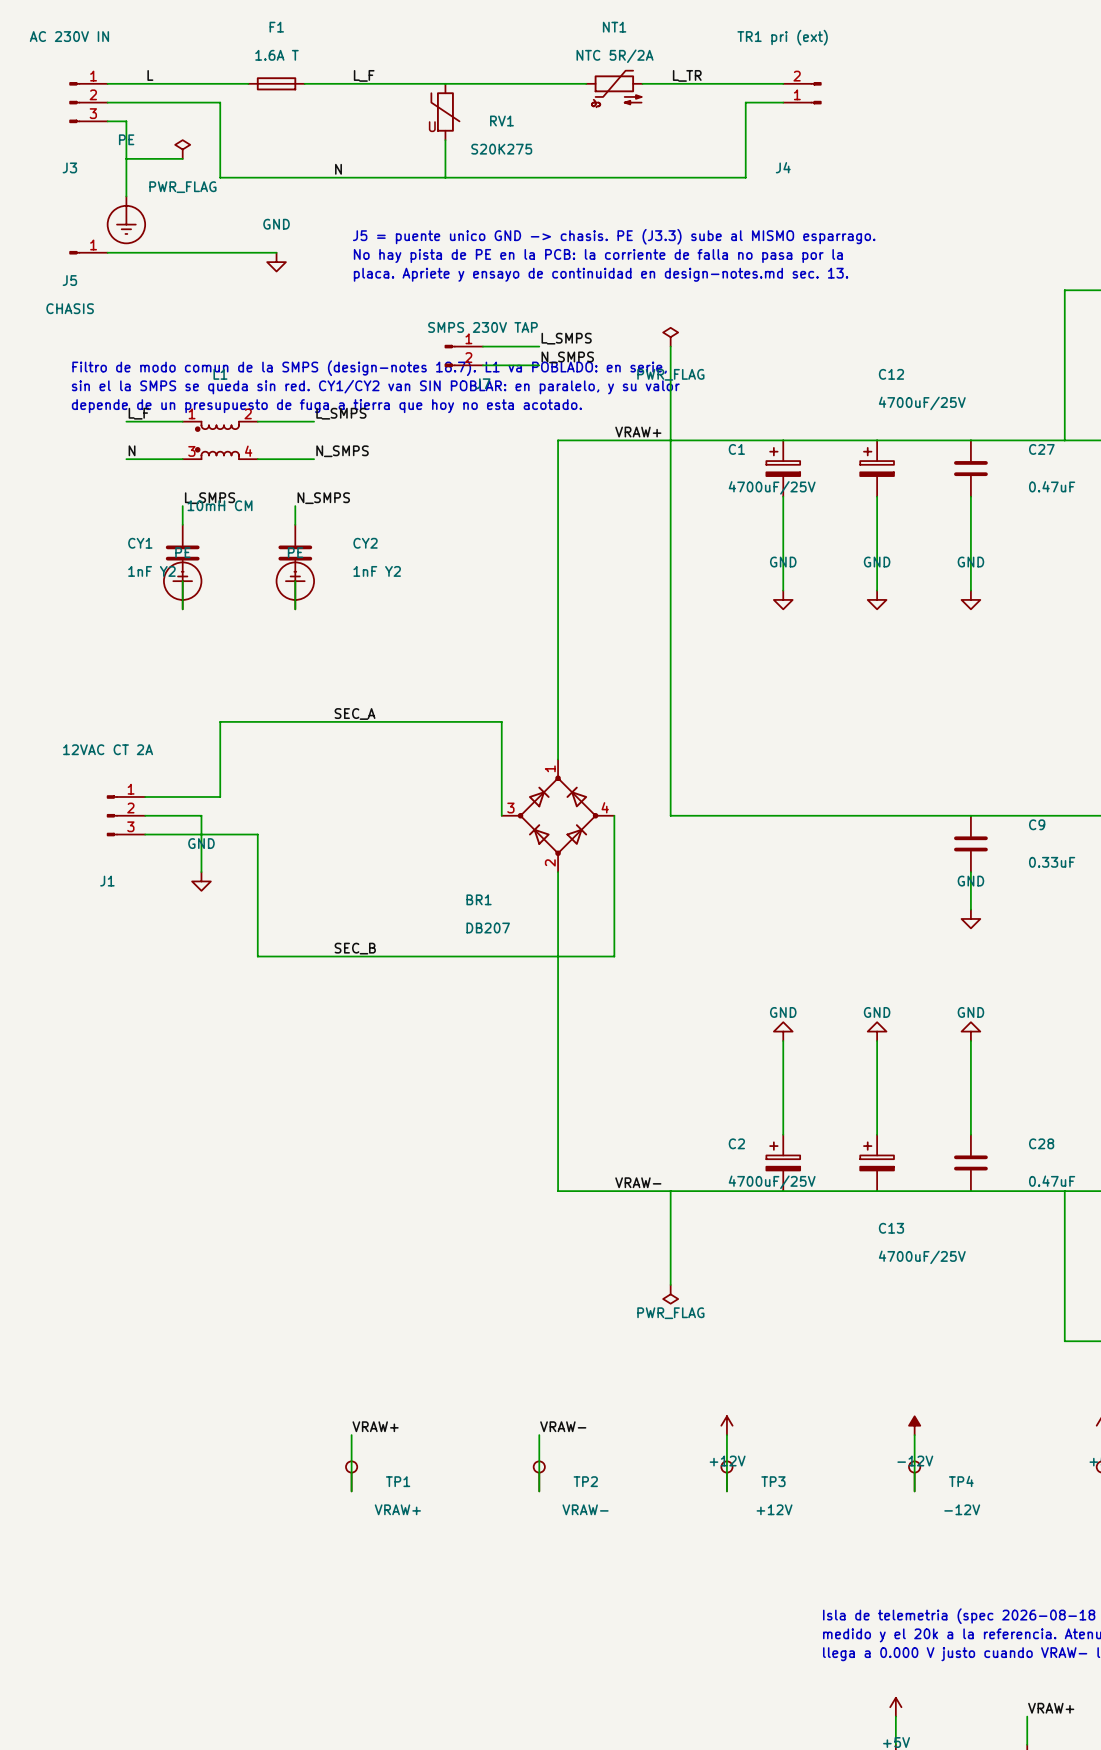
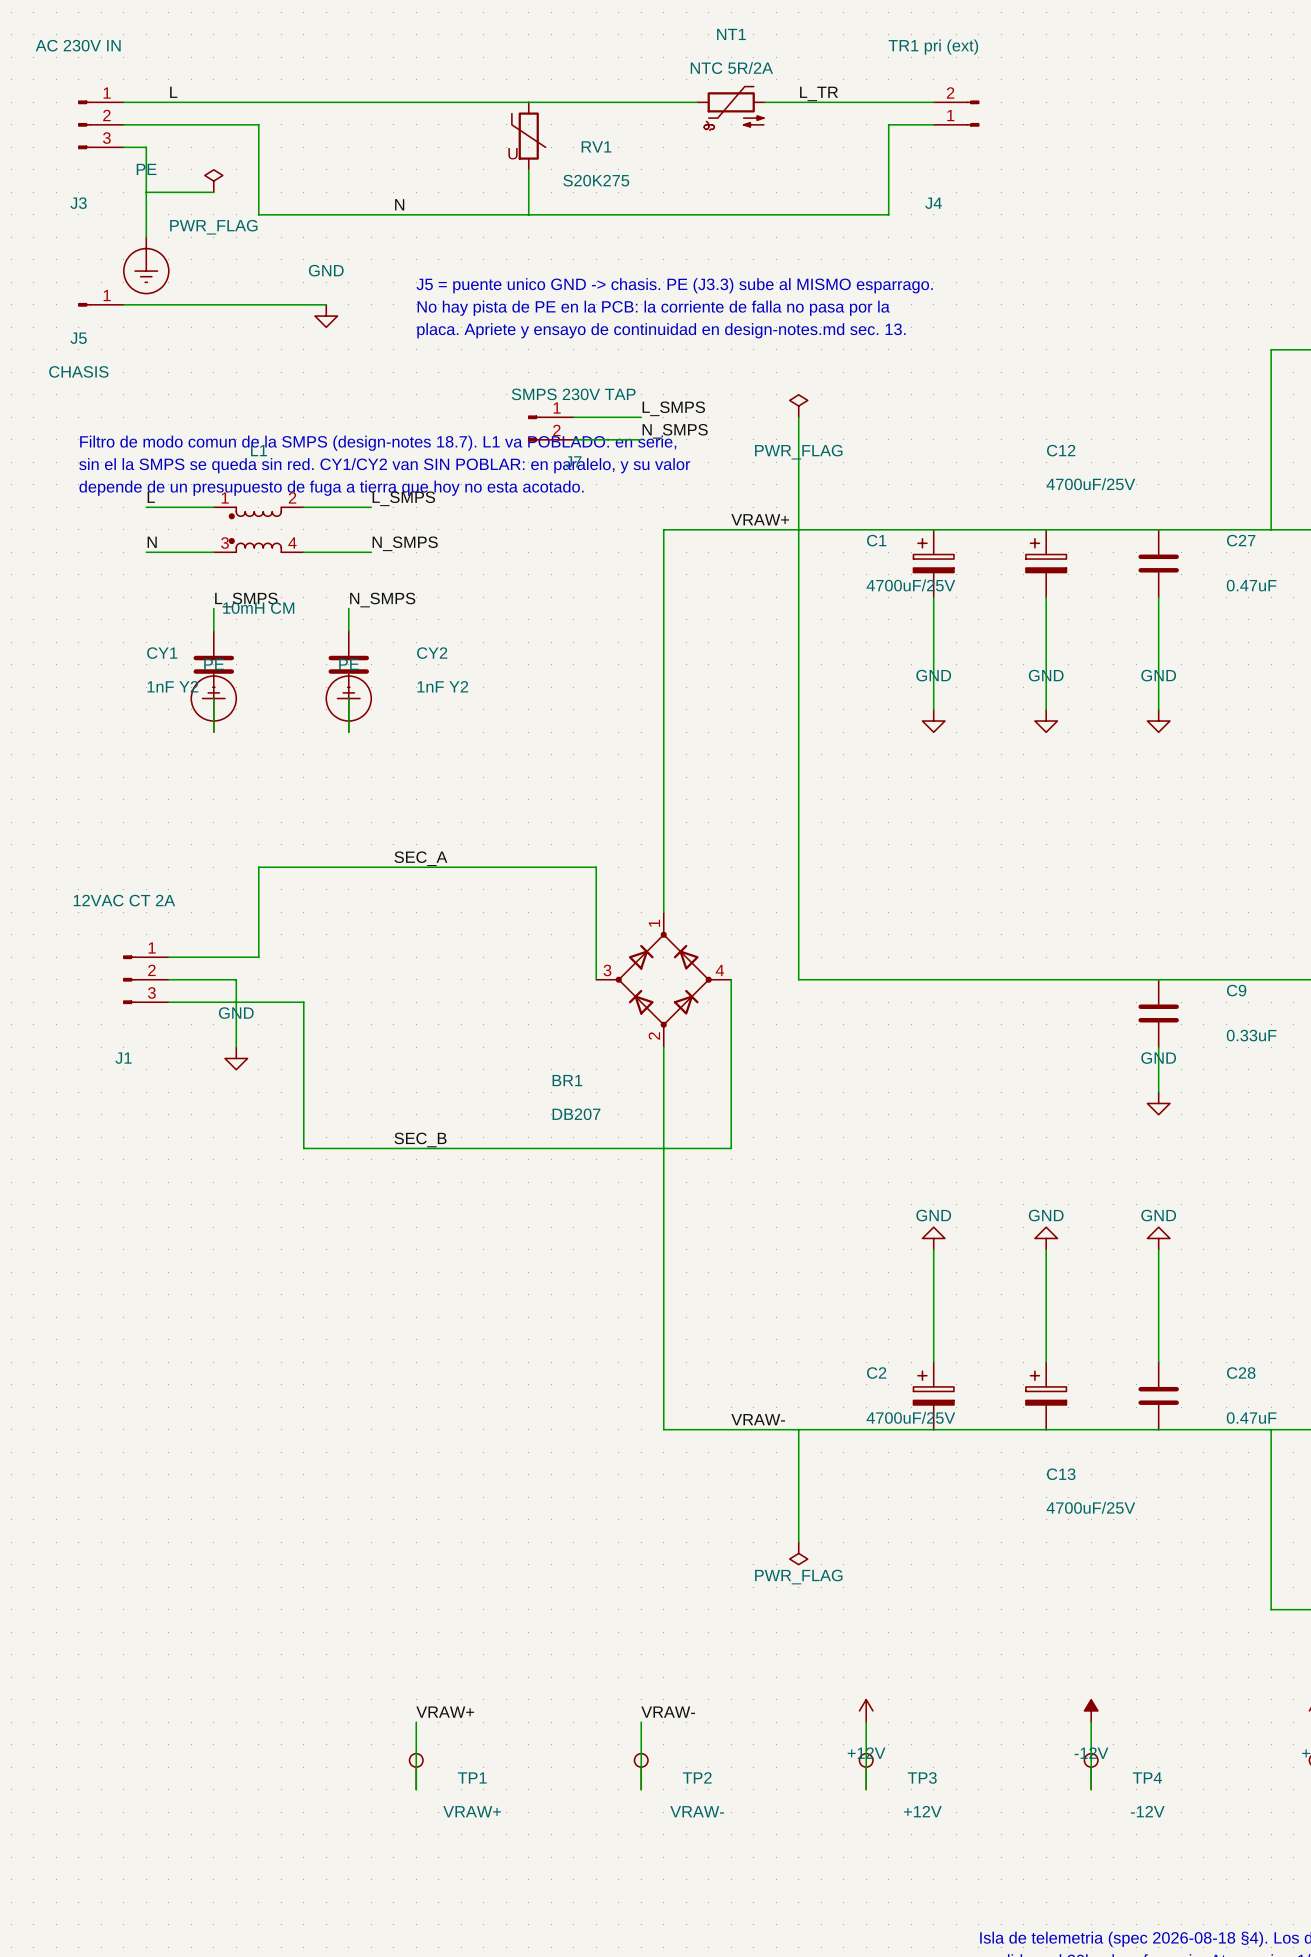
label: L_F (364, 75) -> none
F1: 1.6A T (276, 83) -> none
label: L_F (138, 413) -> L (151, 497)

